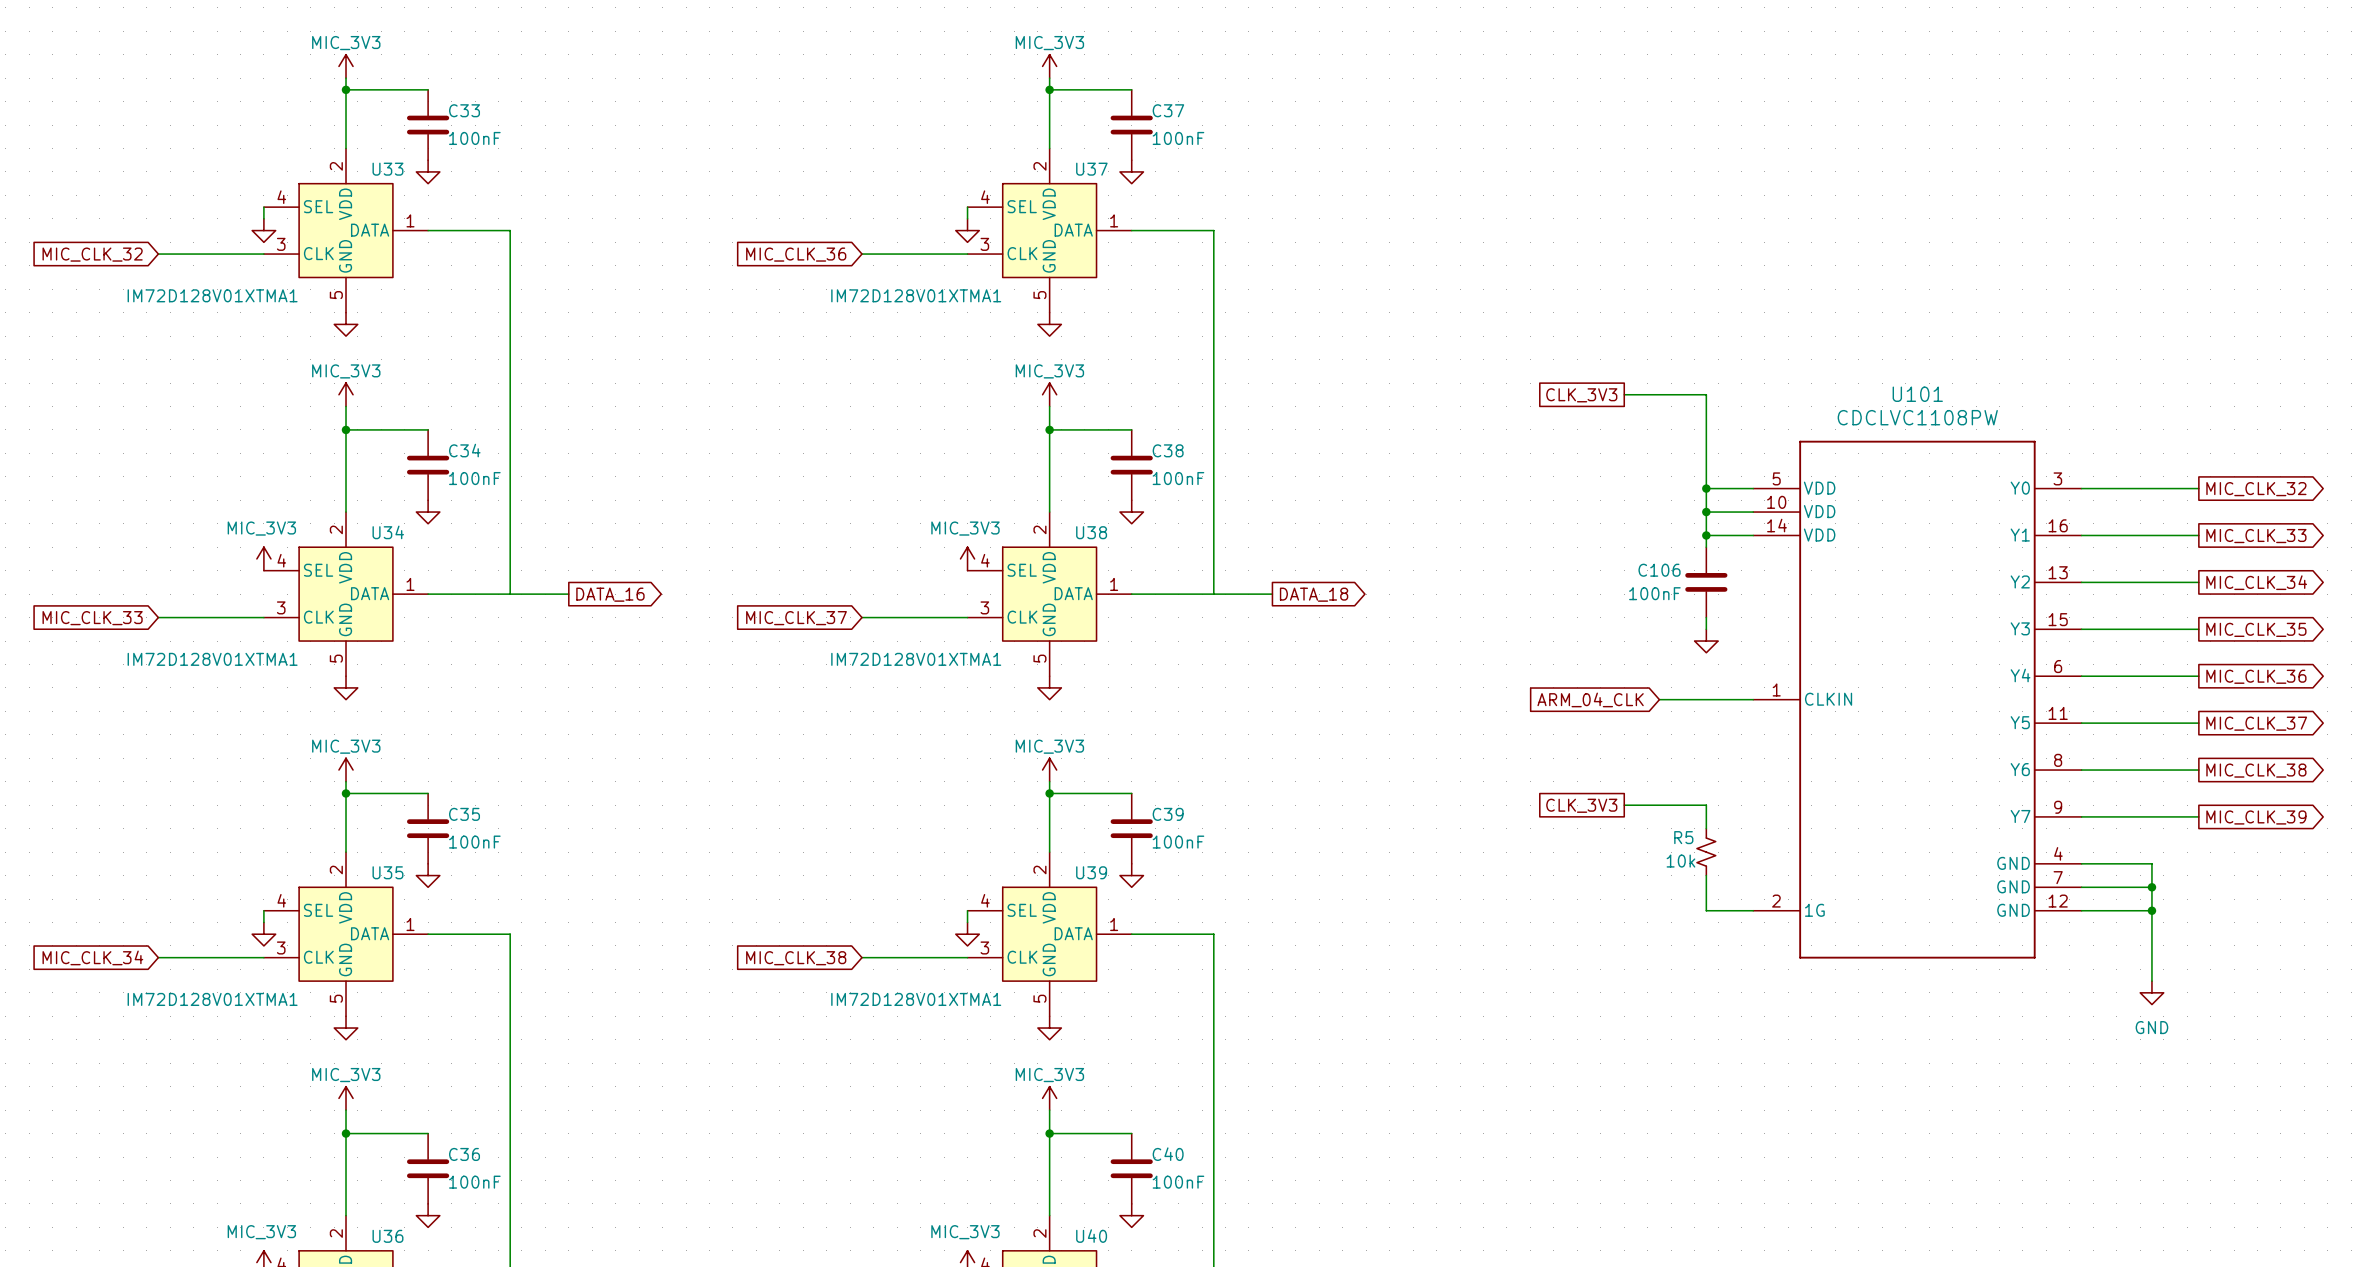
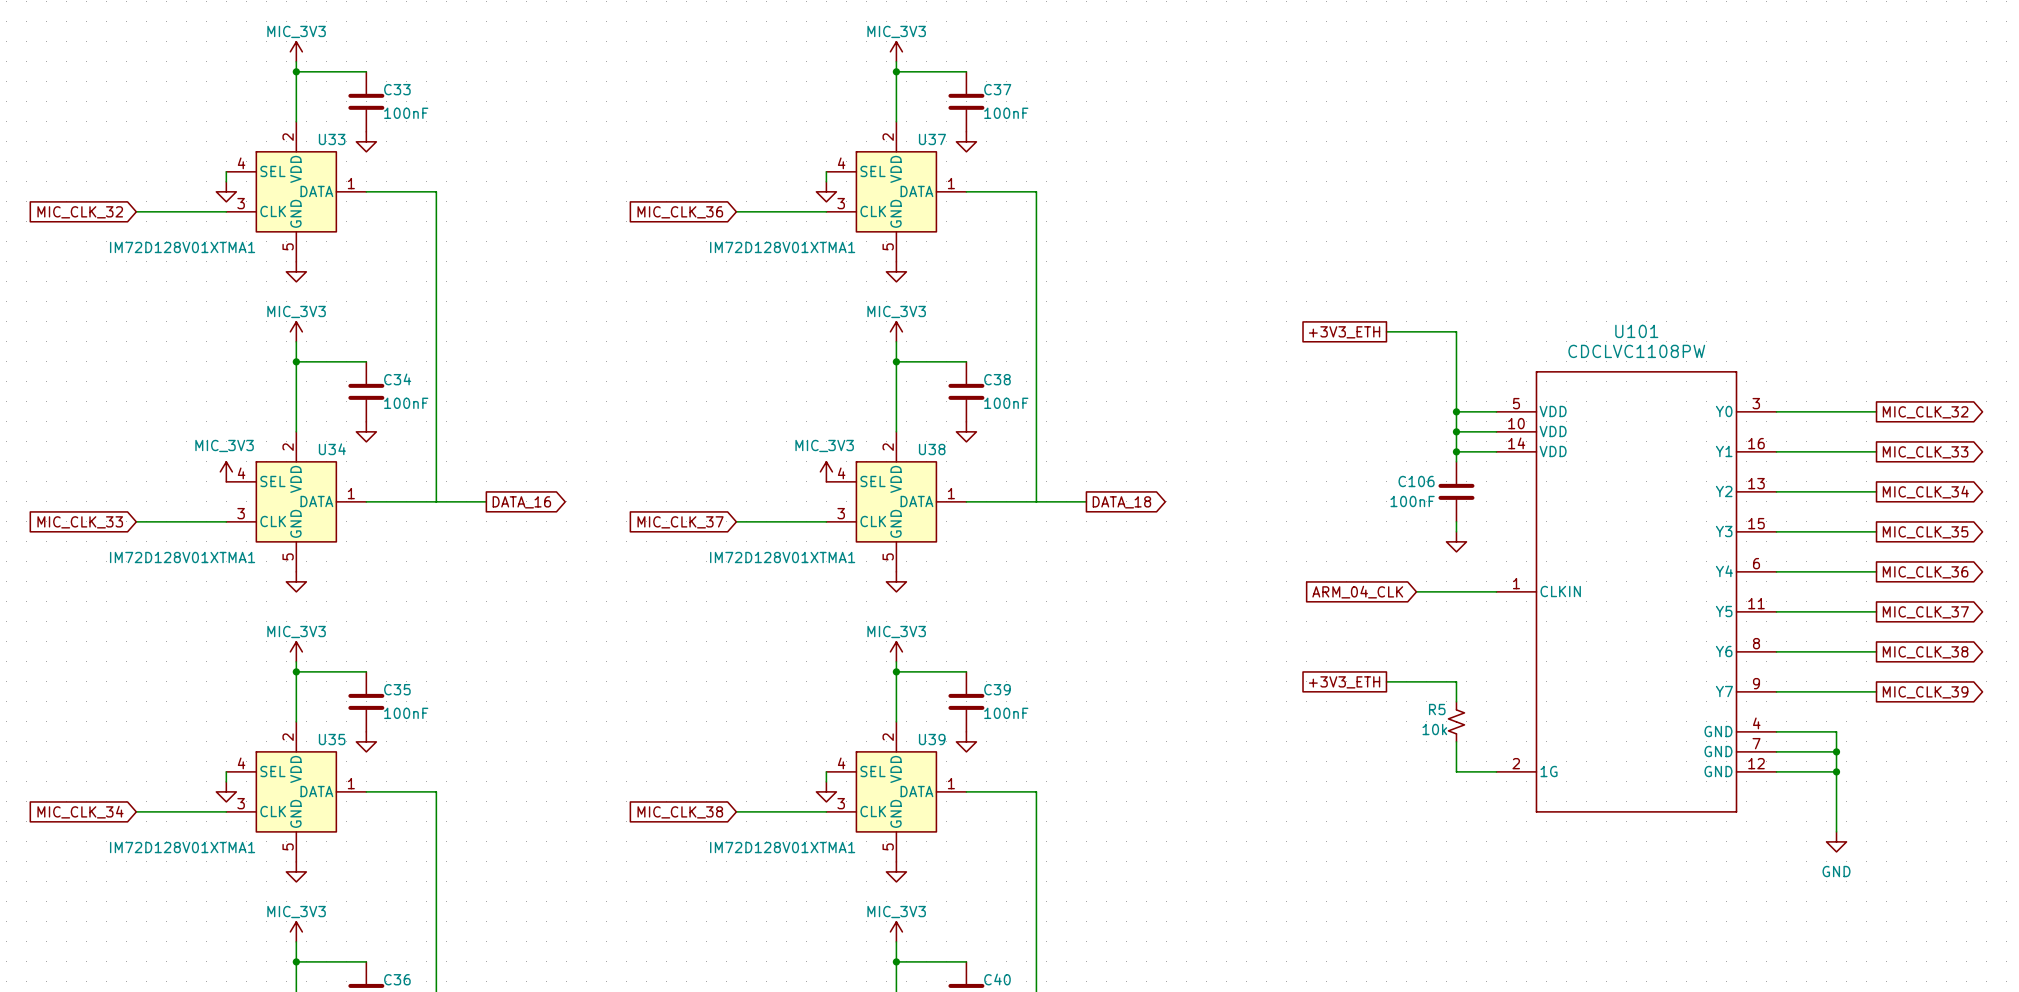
global label: CLK_3V3 (1581, 395) -> +3V3_ETH (1344, 332)
global label: CLK_3V3 (1581, 805) -> +3V3_ETH (1344, 682)

